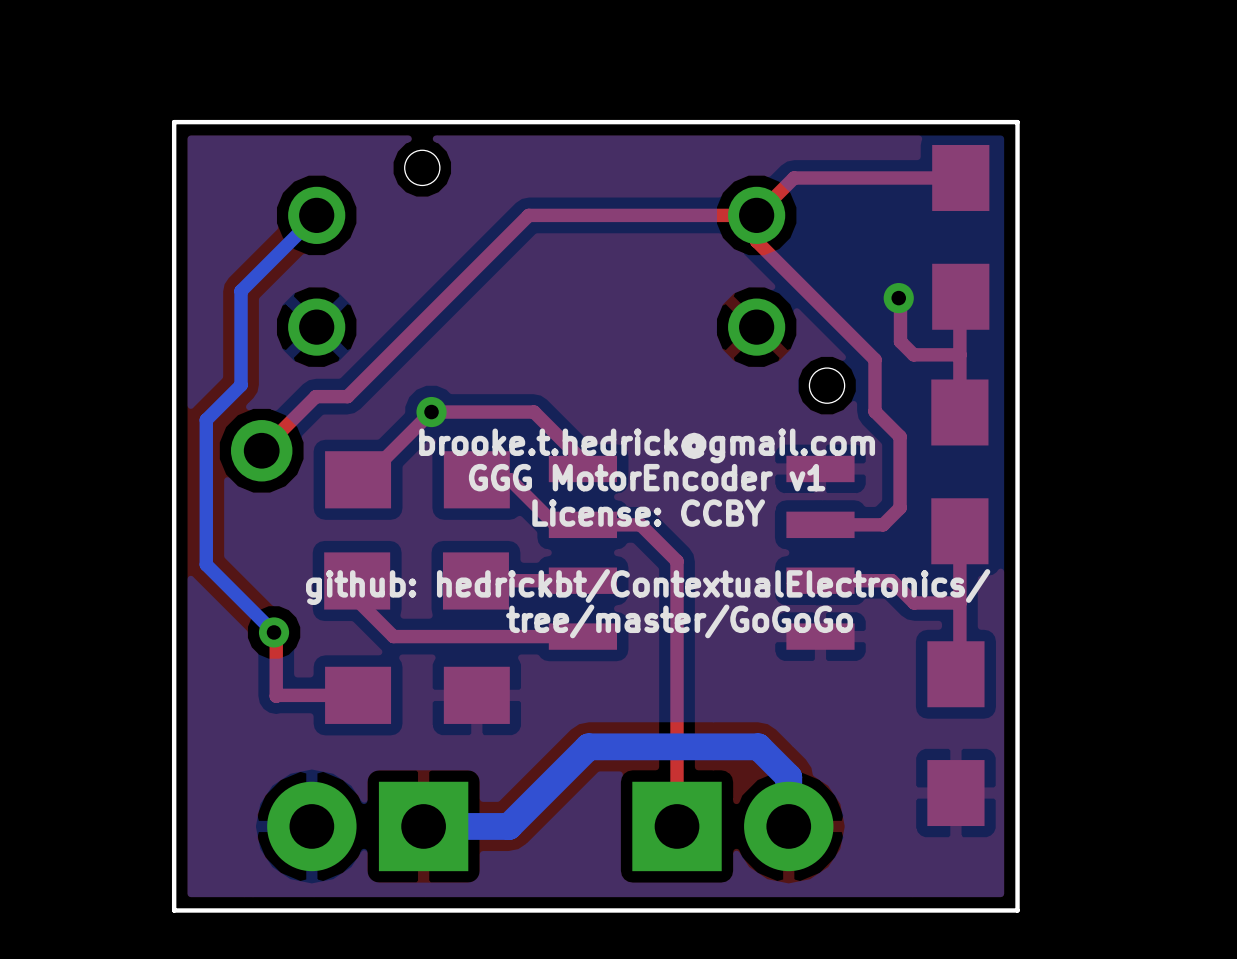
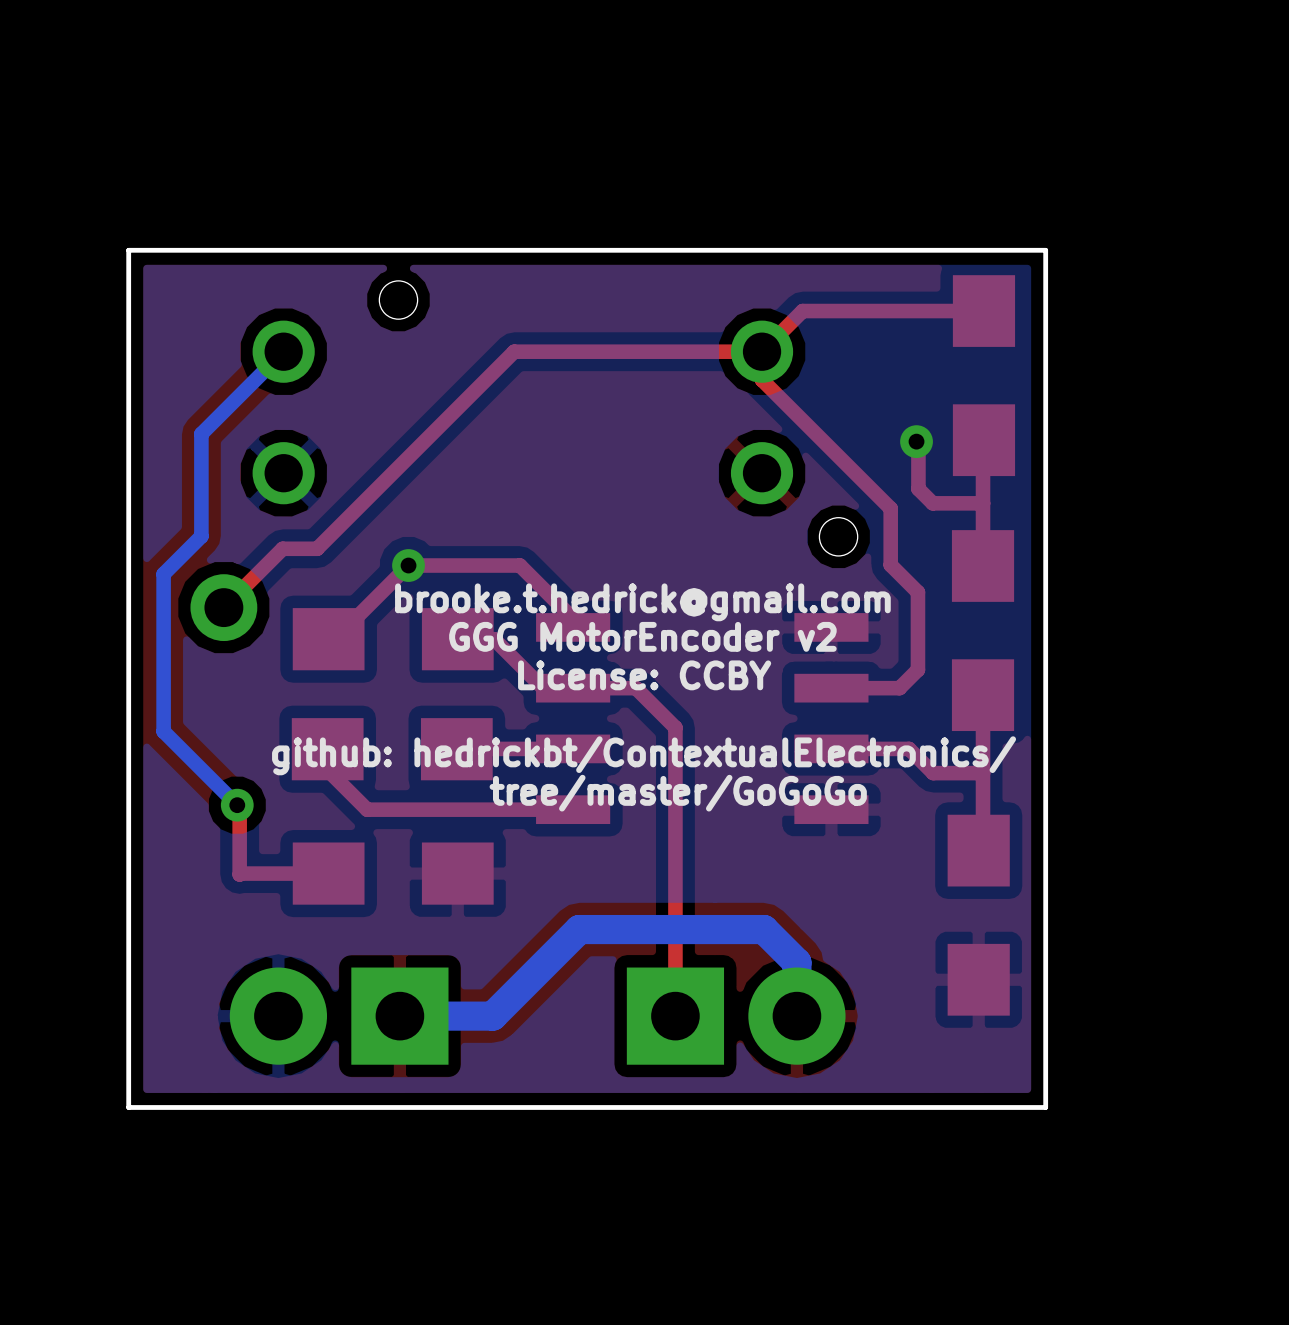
text: GGG MotorEncoder v1 (647, 477) -> GGG MotorEncoder v2 (642, 636)

